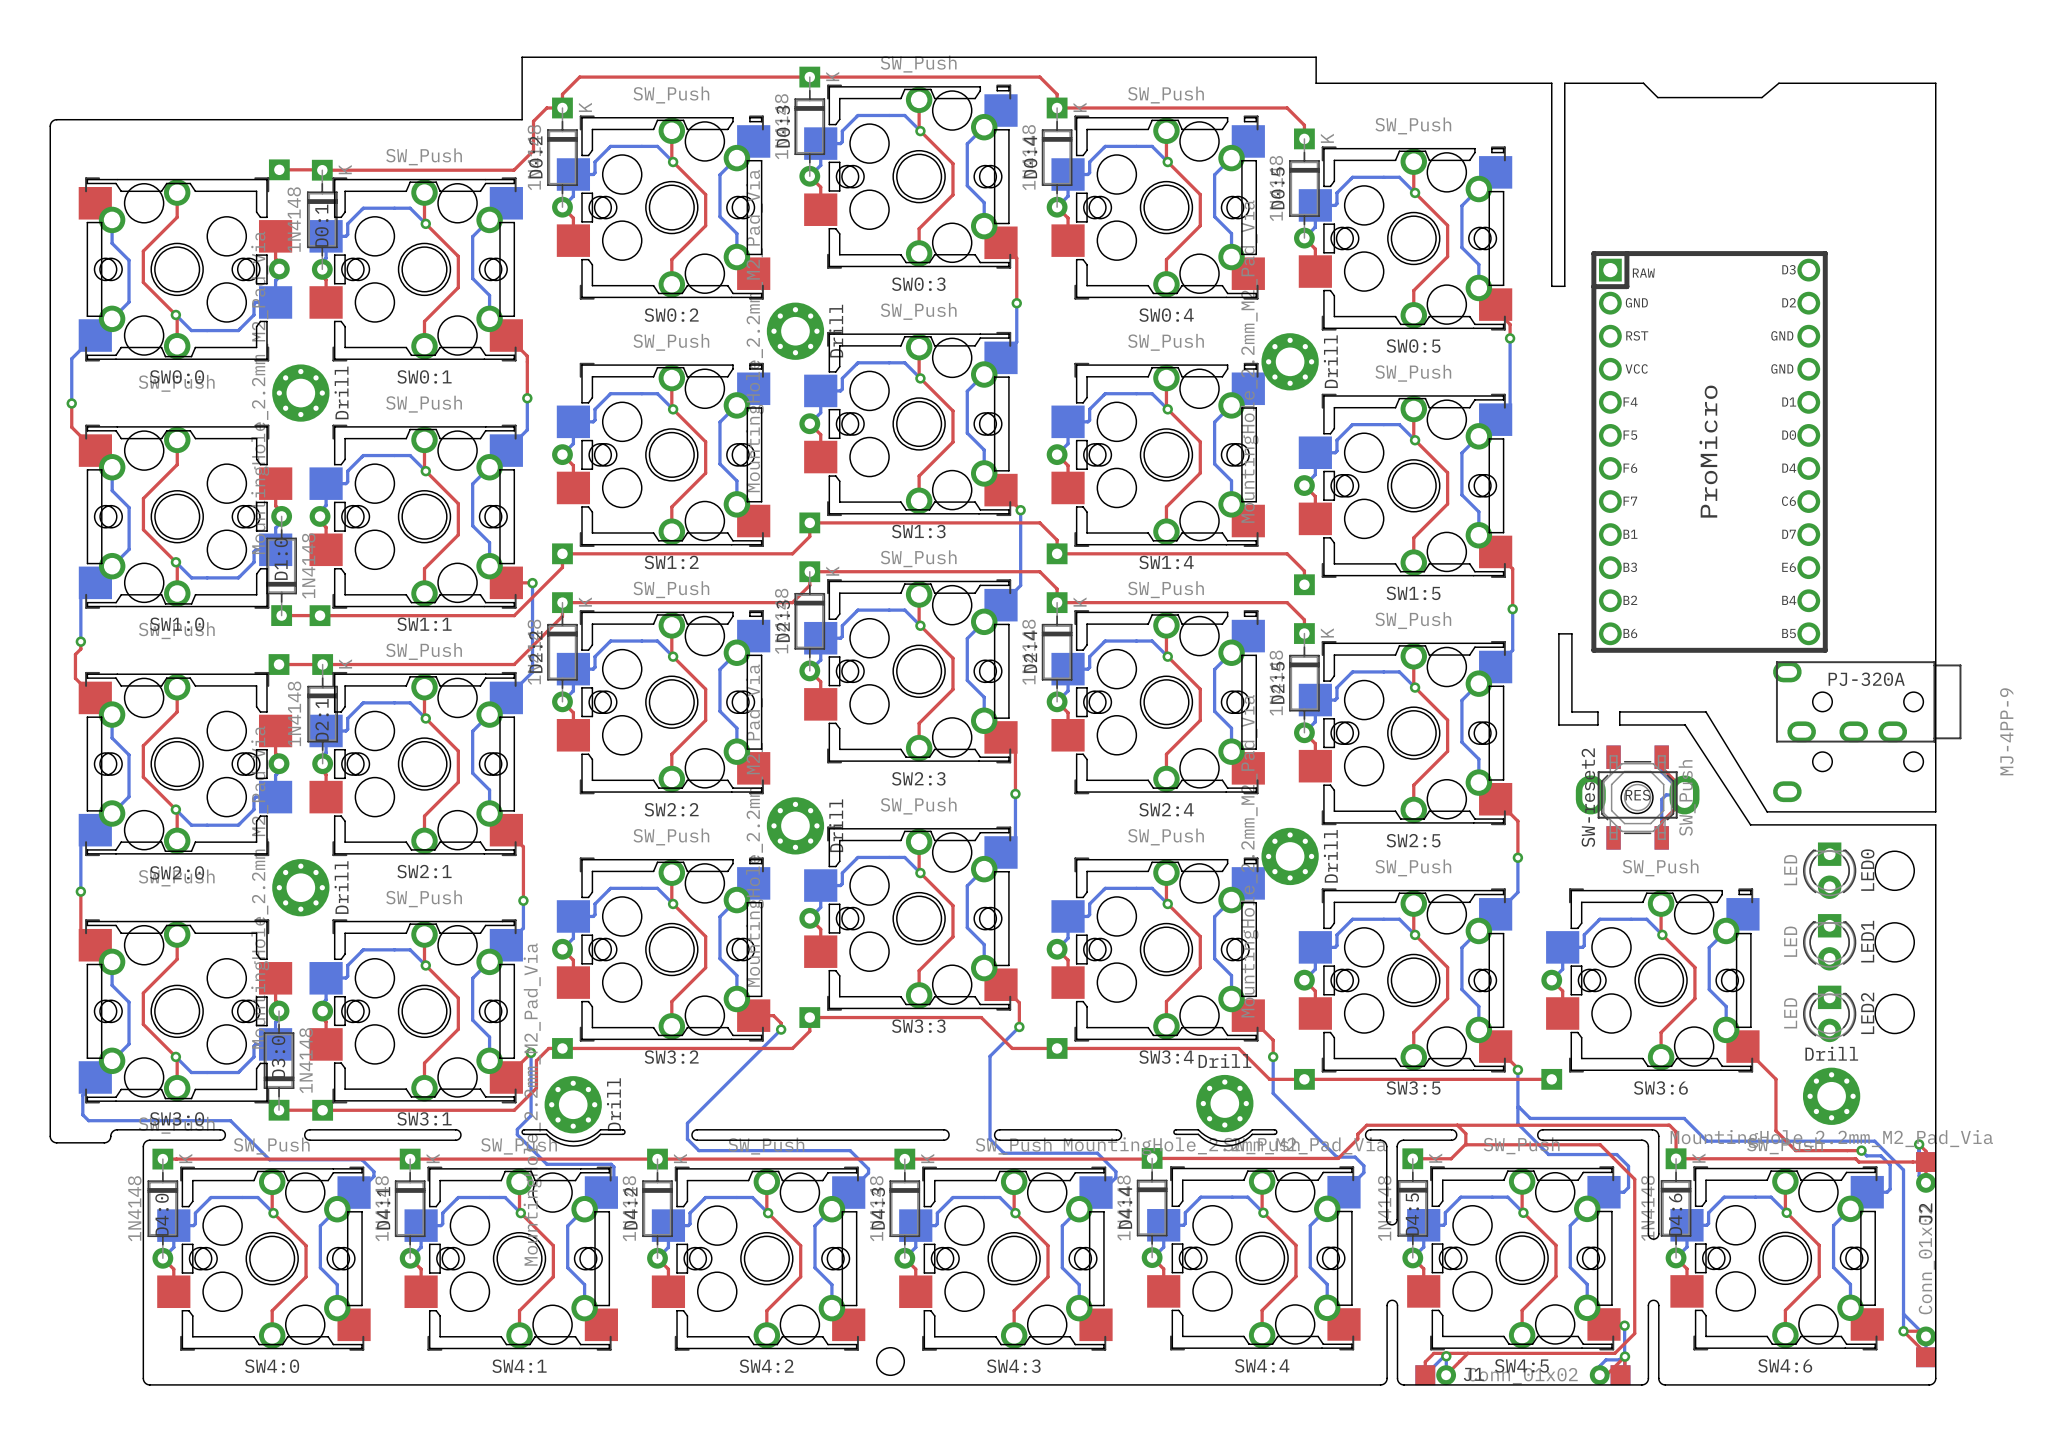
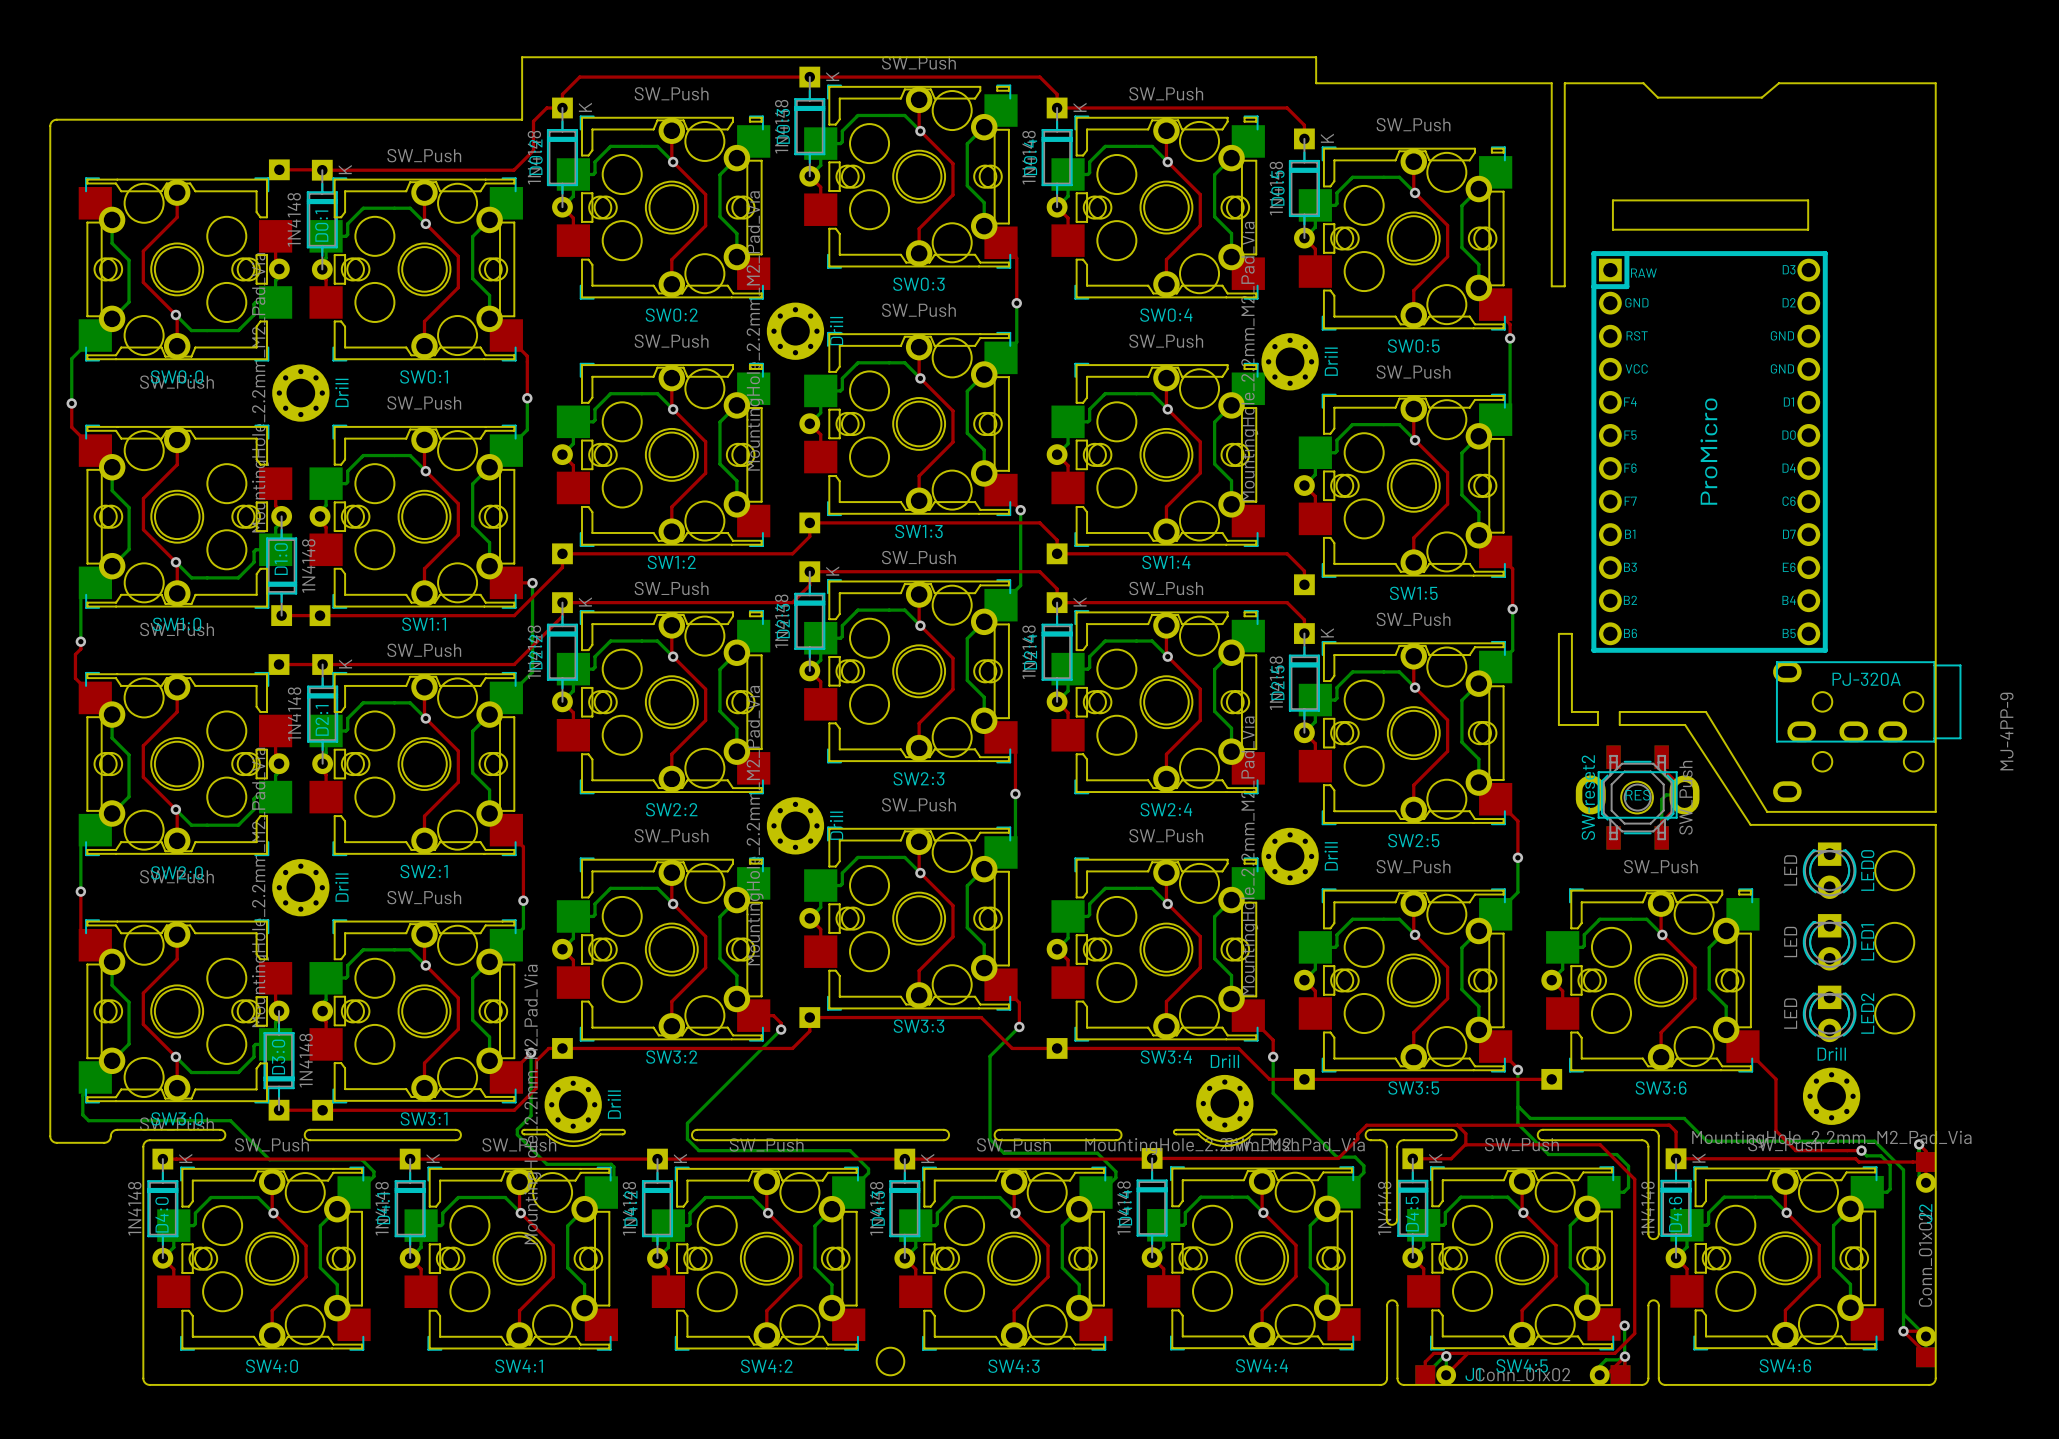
board edge: none -> (1612, 200) (1612, 229) (1808, 229) (1808, 200) (1612, 200)

